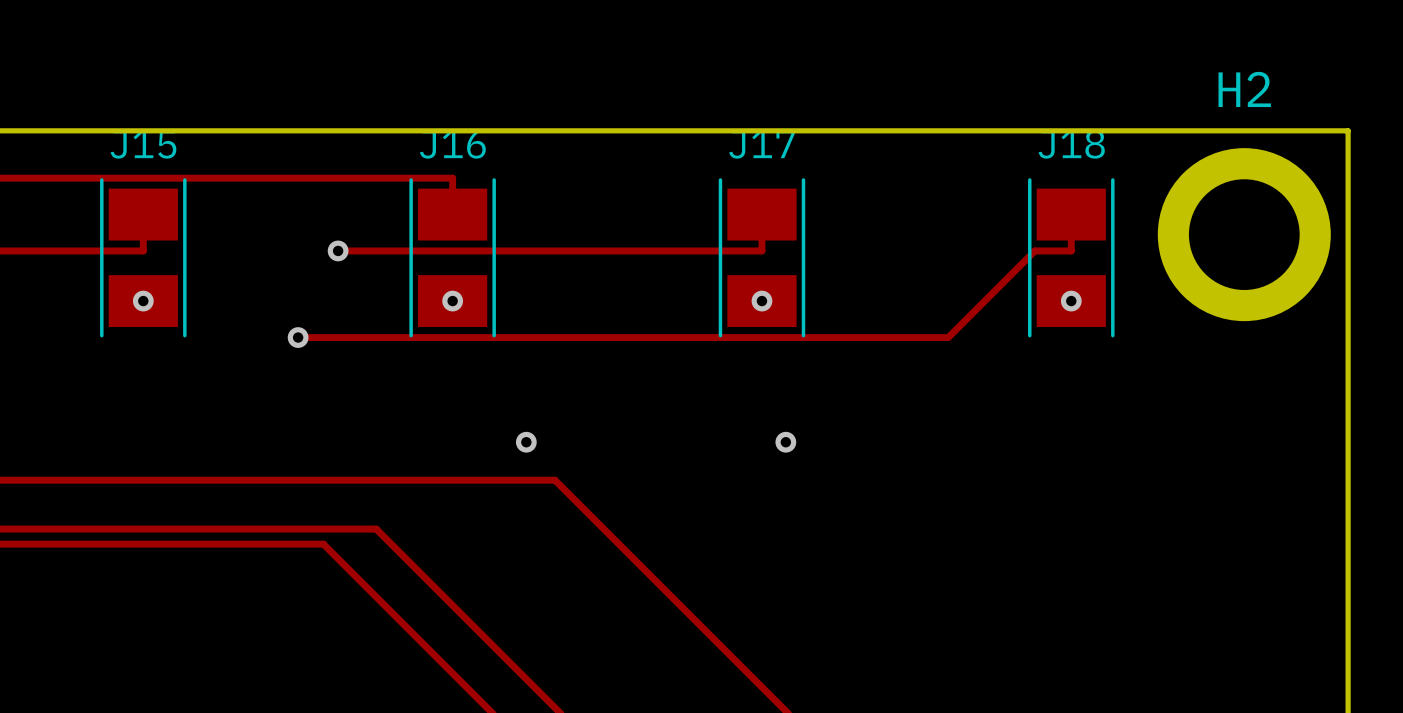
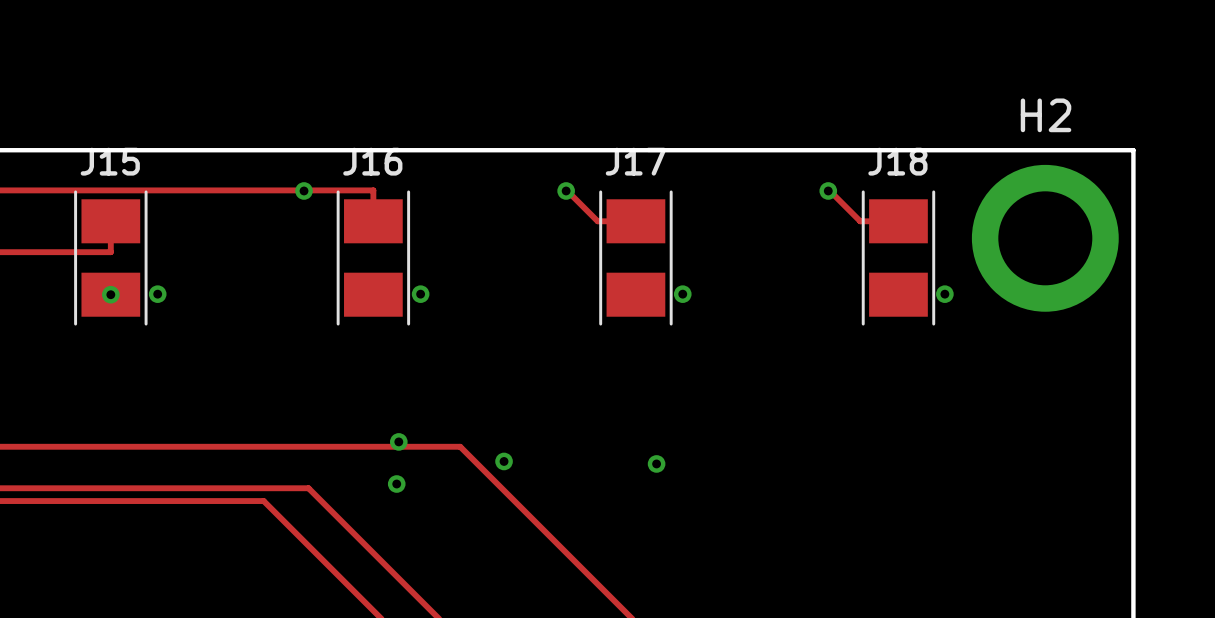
via: none -> (304, 190)
via: none -> (566, 190)
via: none -> (828, 190)
track: (761, 214) (761, 250) (338, 250) -> (635, 221) (597, 221) (566, 190)
track: (1071, 214) (1071, 250) (1034, 250) (948, 337) (298, 337) -> (898, 221) (860, 221) (828, 190)
via: (338, 250) -> none
via: none -> (157, 294)
via position: (452, 301) -> (420, 294)
via position: (761, 301) -> (682, 294)
via position: (1071, 301) -> (944, 294)
via: (298, 337) -> none
via: (526, 442) -> none
via position: (785, 442) -> (656, 463)
via: none -> (398, 441)
via: none -> (504, 461)
via: none -> (396, 484)

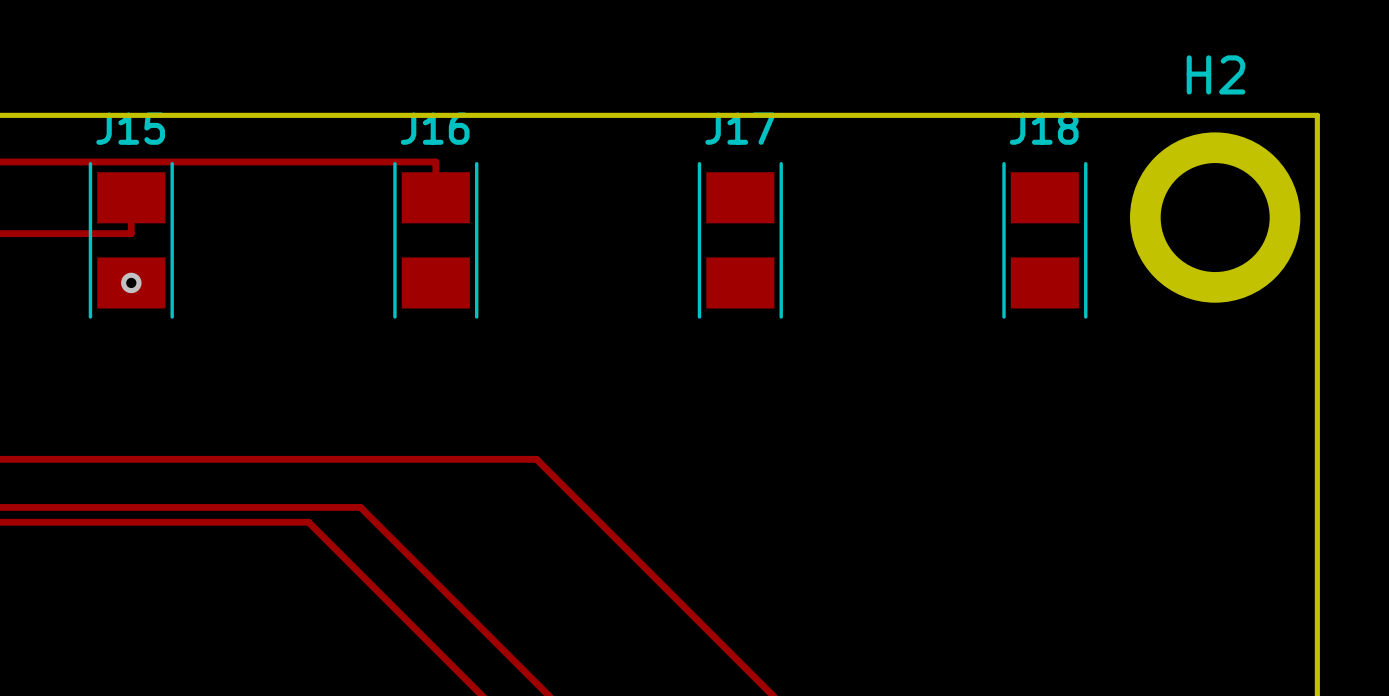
via: (304, 190) -> none
track: (566, 190) (597, 221) (635, 221) -> none
via: (566, 190) -> none
track: (828, 190) (860, 221) (898, 221) -> none
via: (828, 190) -> none
via: (157, 294) -> none
via: (420, 294) -> none
via: (682, 294) -> none
via: (944, 294) -> none
via: (398, 441) -> none
via: (504, 461) -> none
via: (656, 463) -> none
via: (396, 484) -> none

